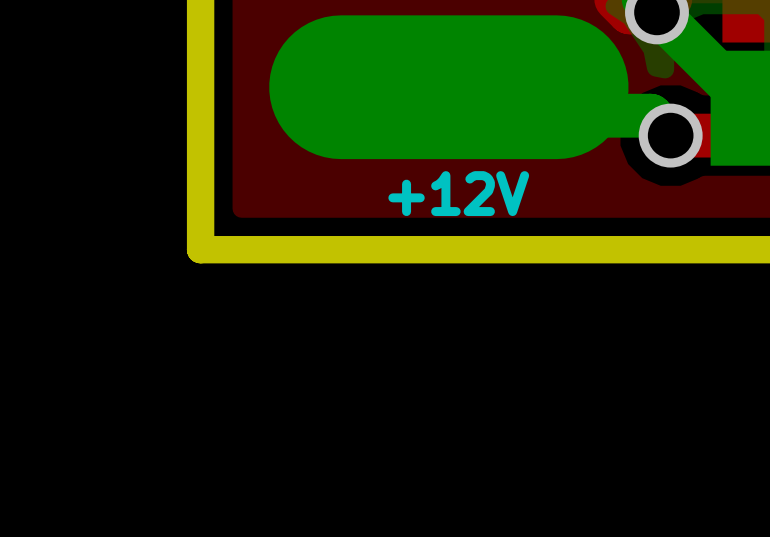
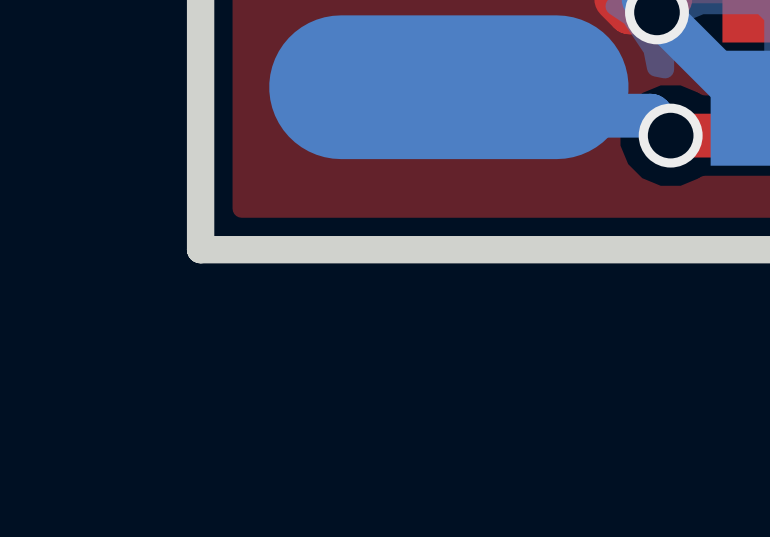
text: +12V (458, 193) -> none

